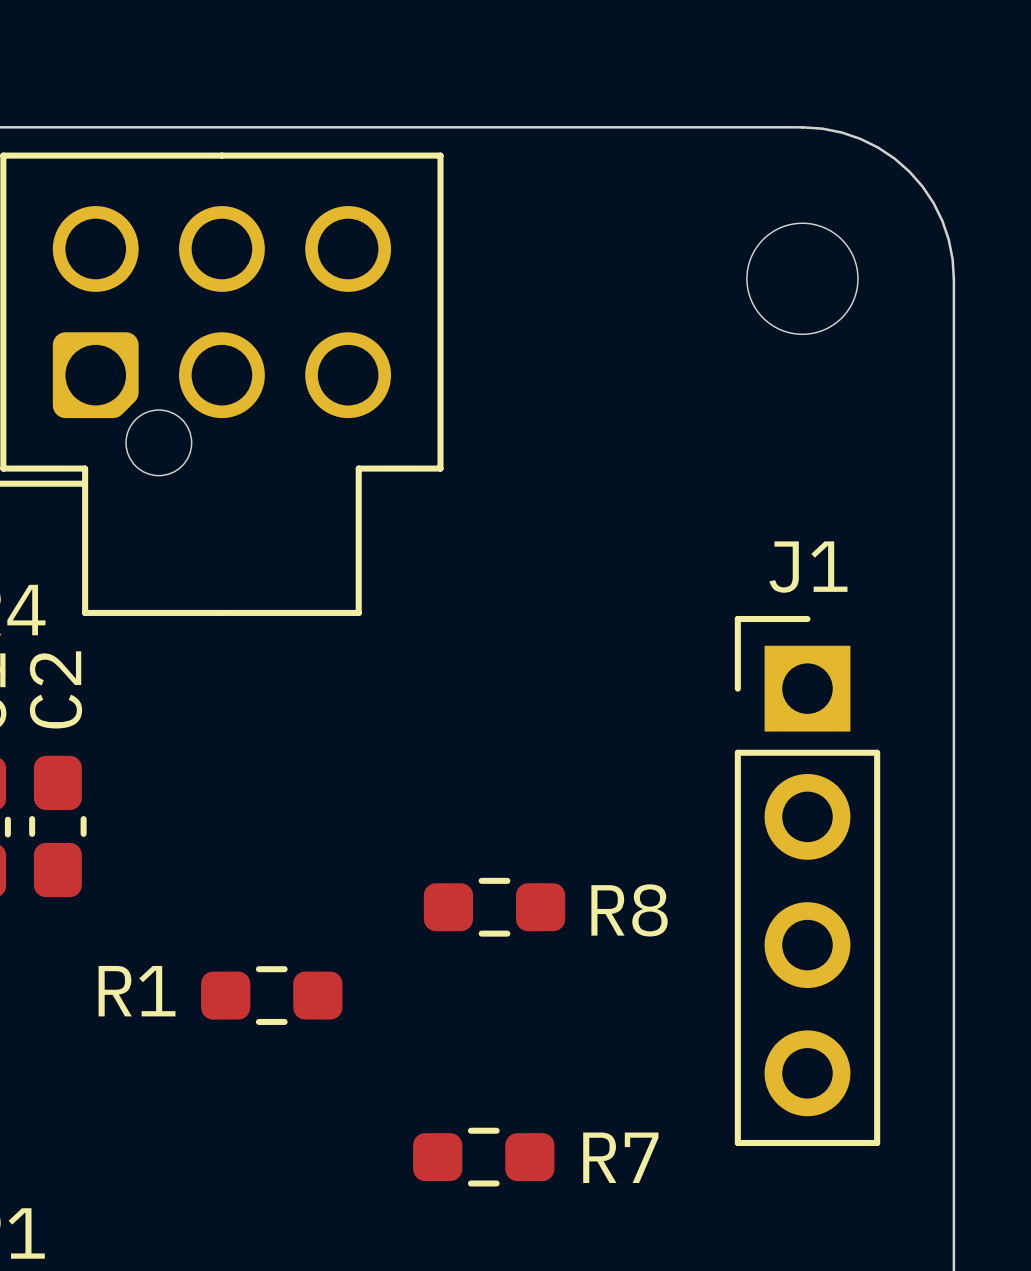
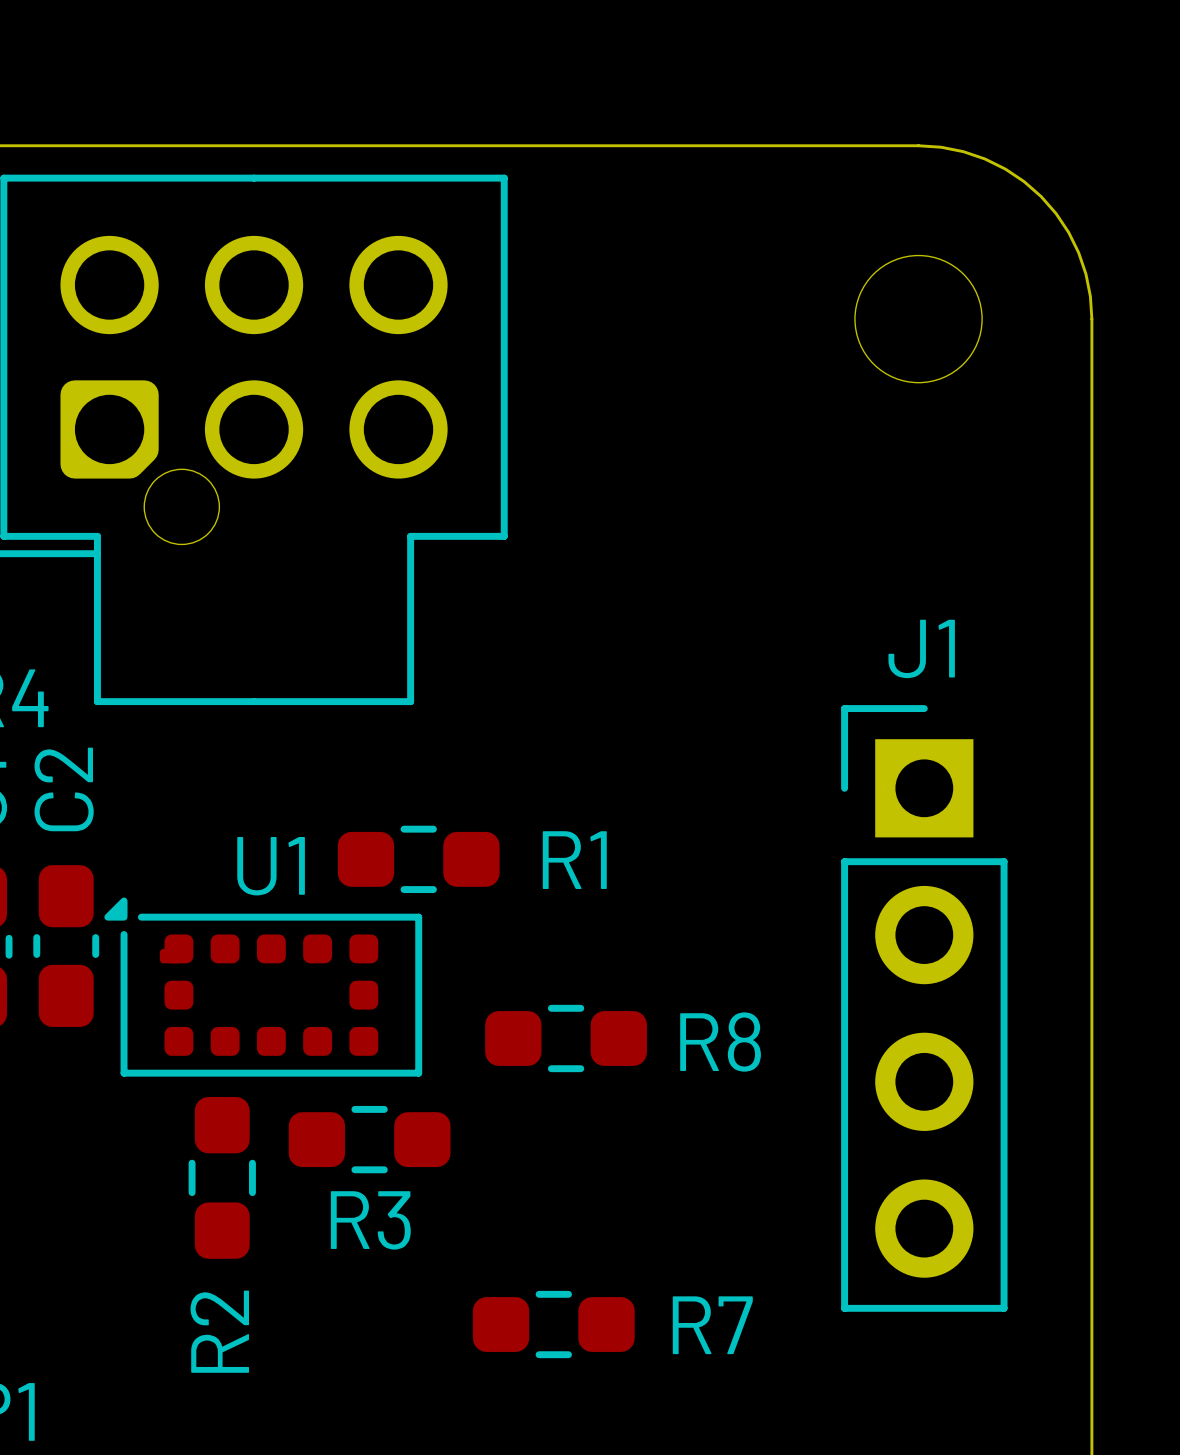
U1: none -> (263, 987)
R1 name position: R1 (137, 991) -> R1 (574, 860)
R1 position: (271, 995) -> (418, 859)
R3: none -> (369, 1139)
R2: none -> (222, 1177)

